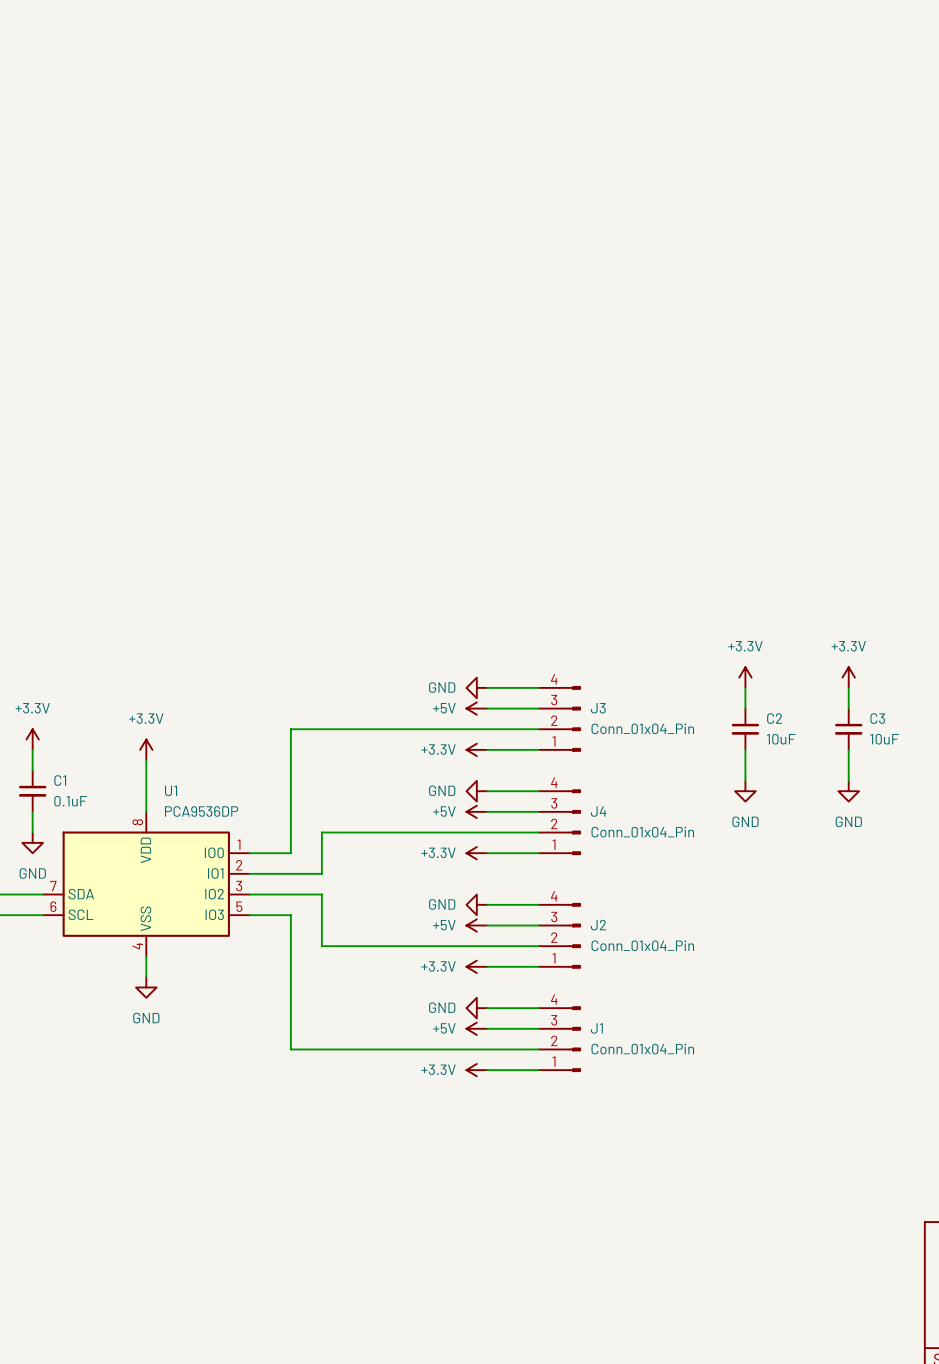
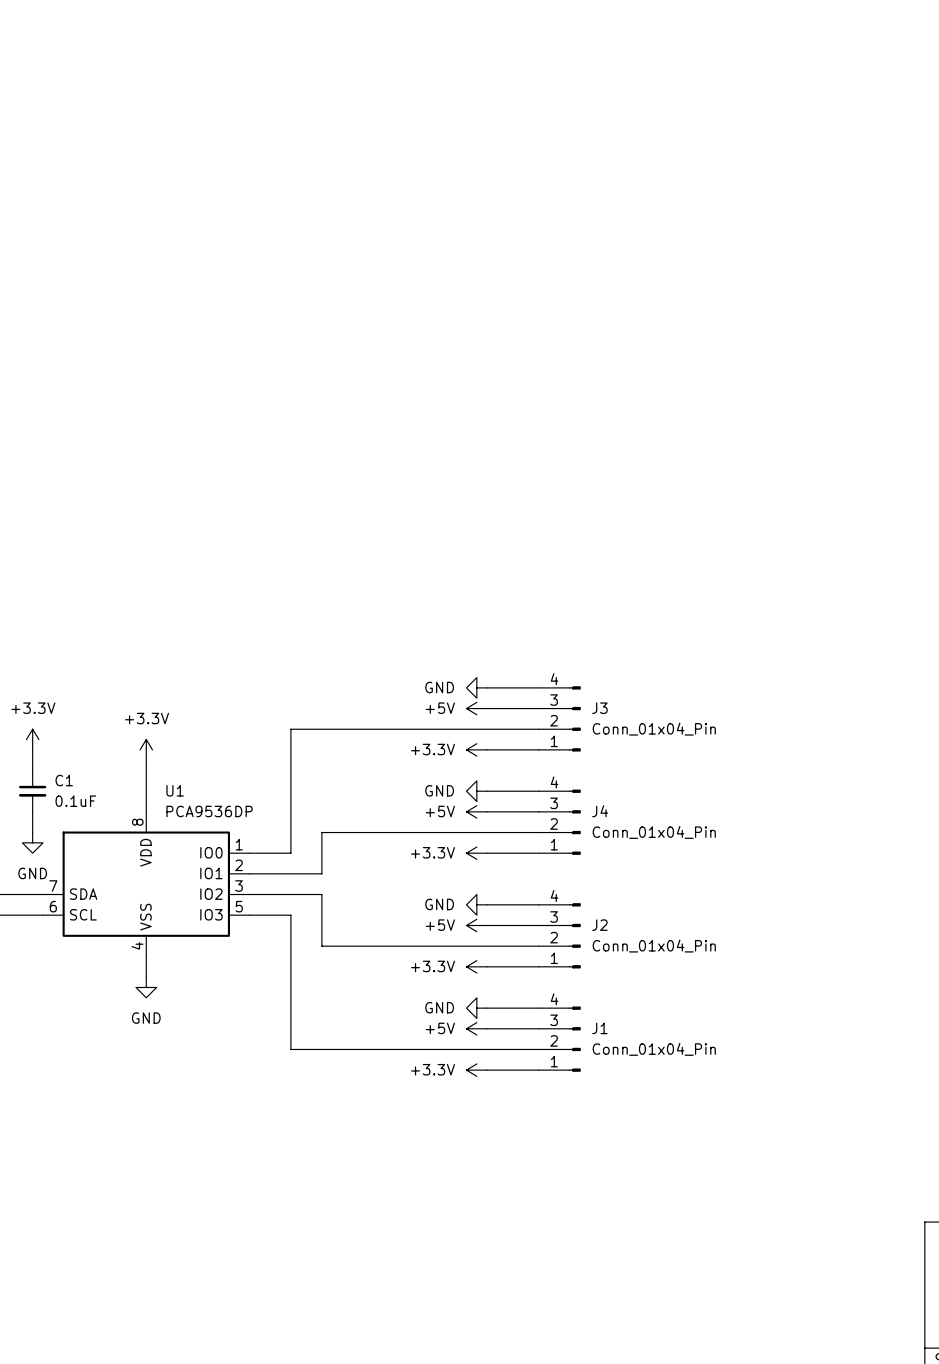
power symbol: +3.3V (745, 677) -> none
power symbol: +3.3V (848, 677) -> none
wire: (745, 687) (745, 708) -> none
wire: (848, 687) (848, 708) -> none
C2: 10uF (745, 729) -> none
C3: 10uF (848, 729) -> none
wire: (745, 749) (745, 780) -> none
wire: (848, 749) (848, 780) -> none
power symbol: GND (745, 791) -> none
power symbol: GND (848, 791) -> none

